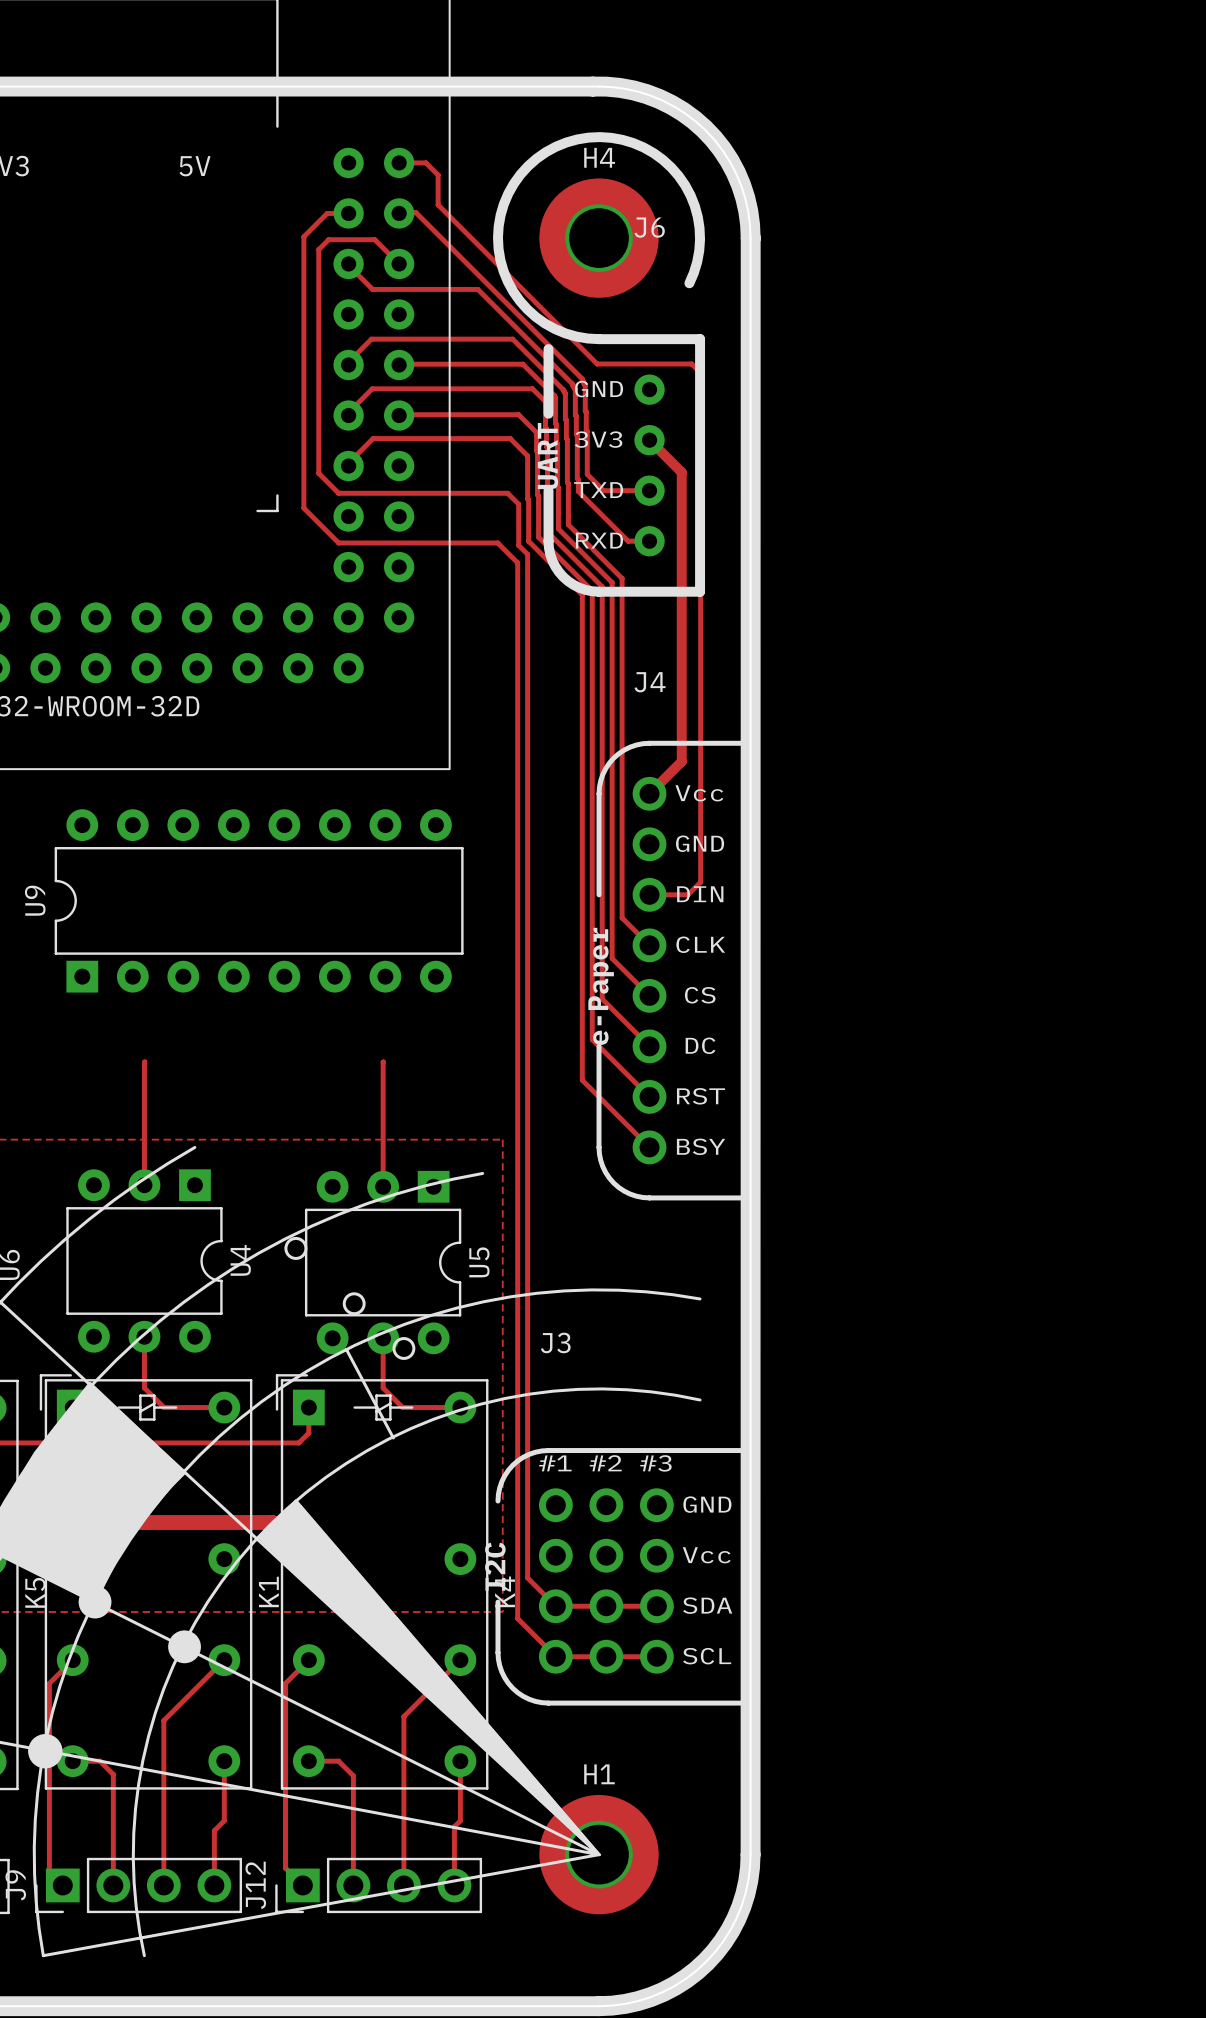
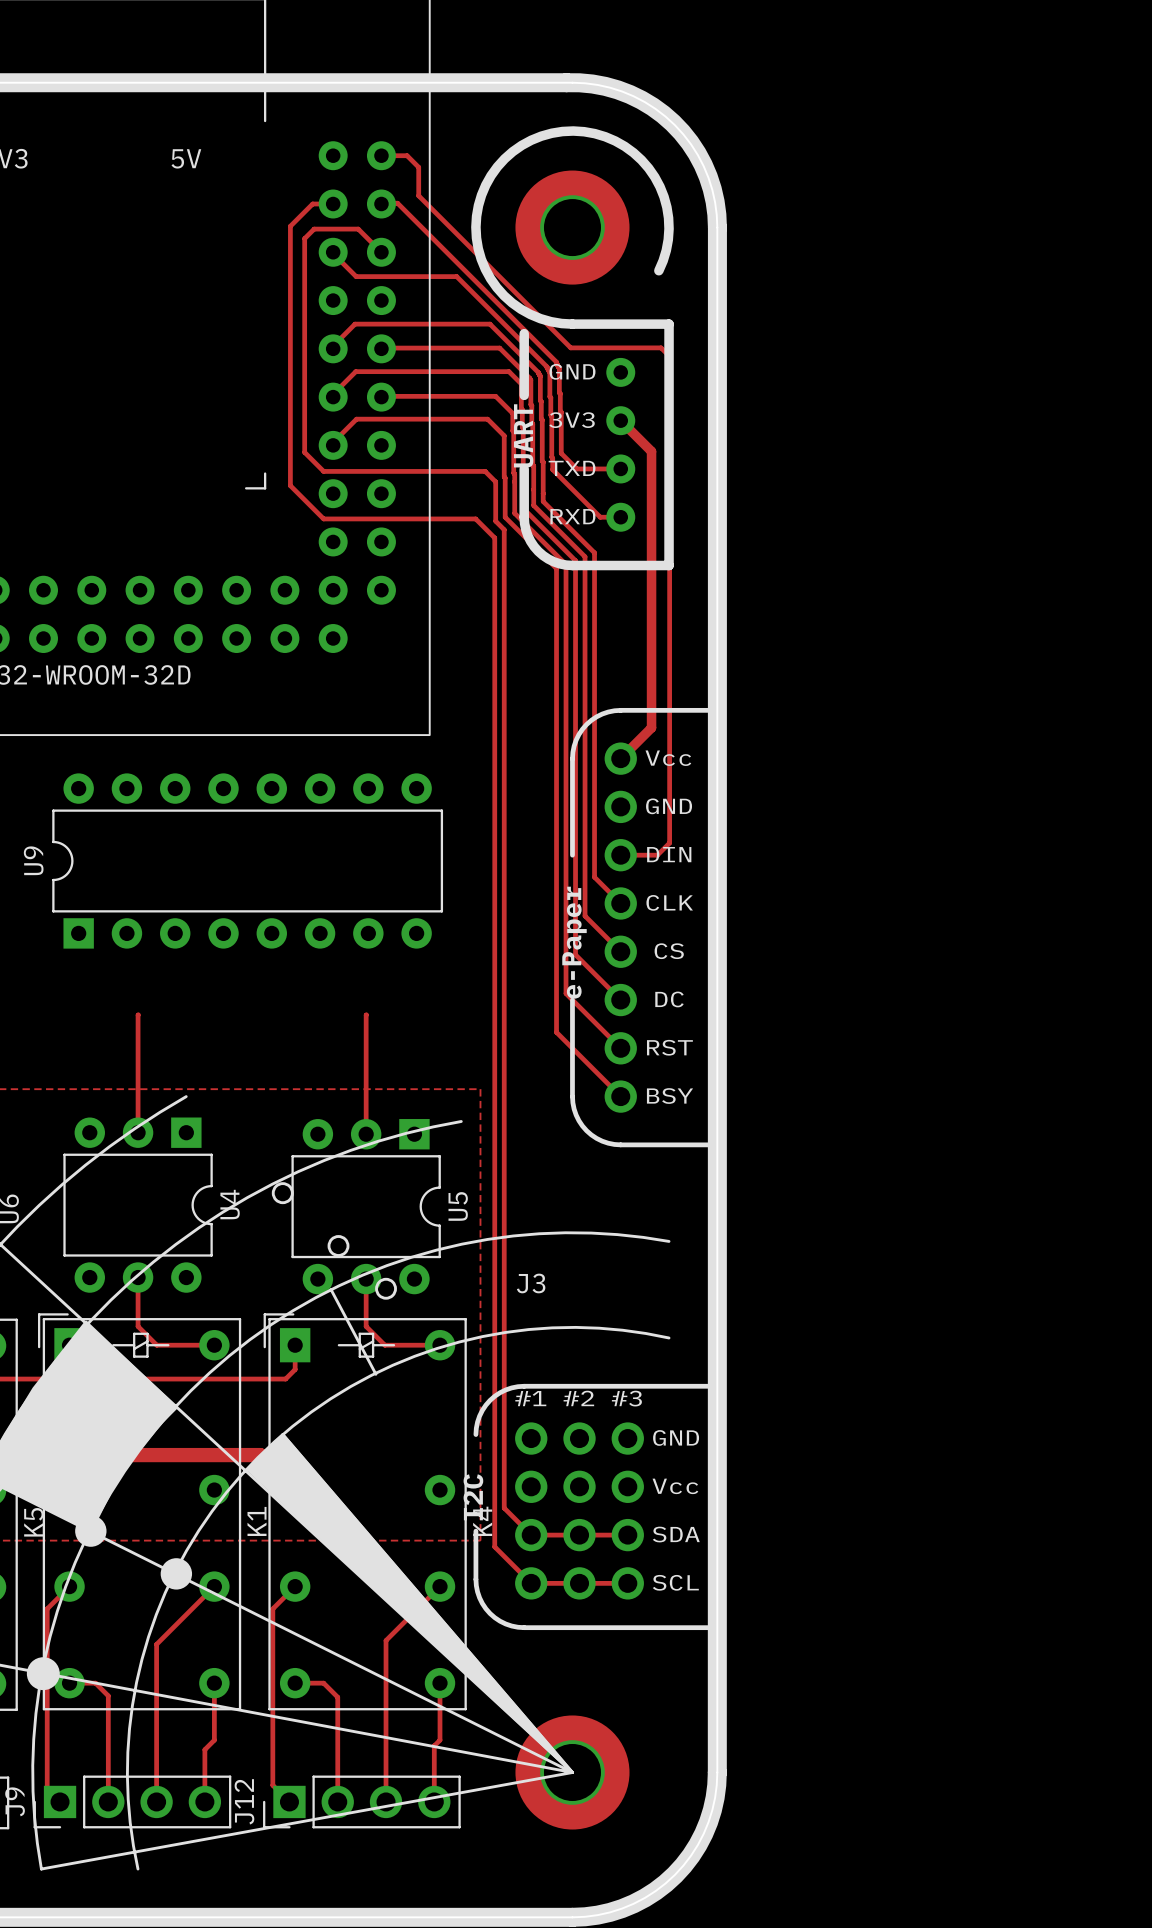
H4 name: H4 (599, 157) -> none
J6 name: J6 (649, 227) -> none
J4 name: J4 (650, 682) -> none
H1 name: H1 (599, 1774) -> none

